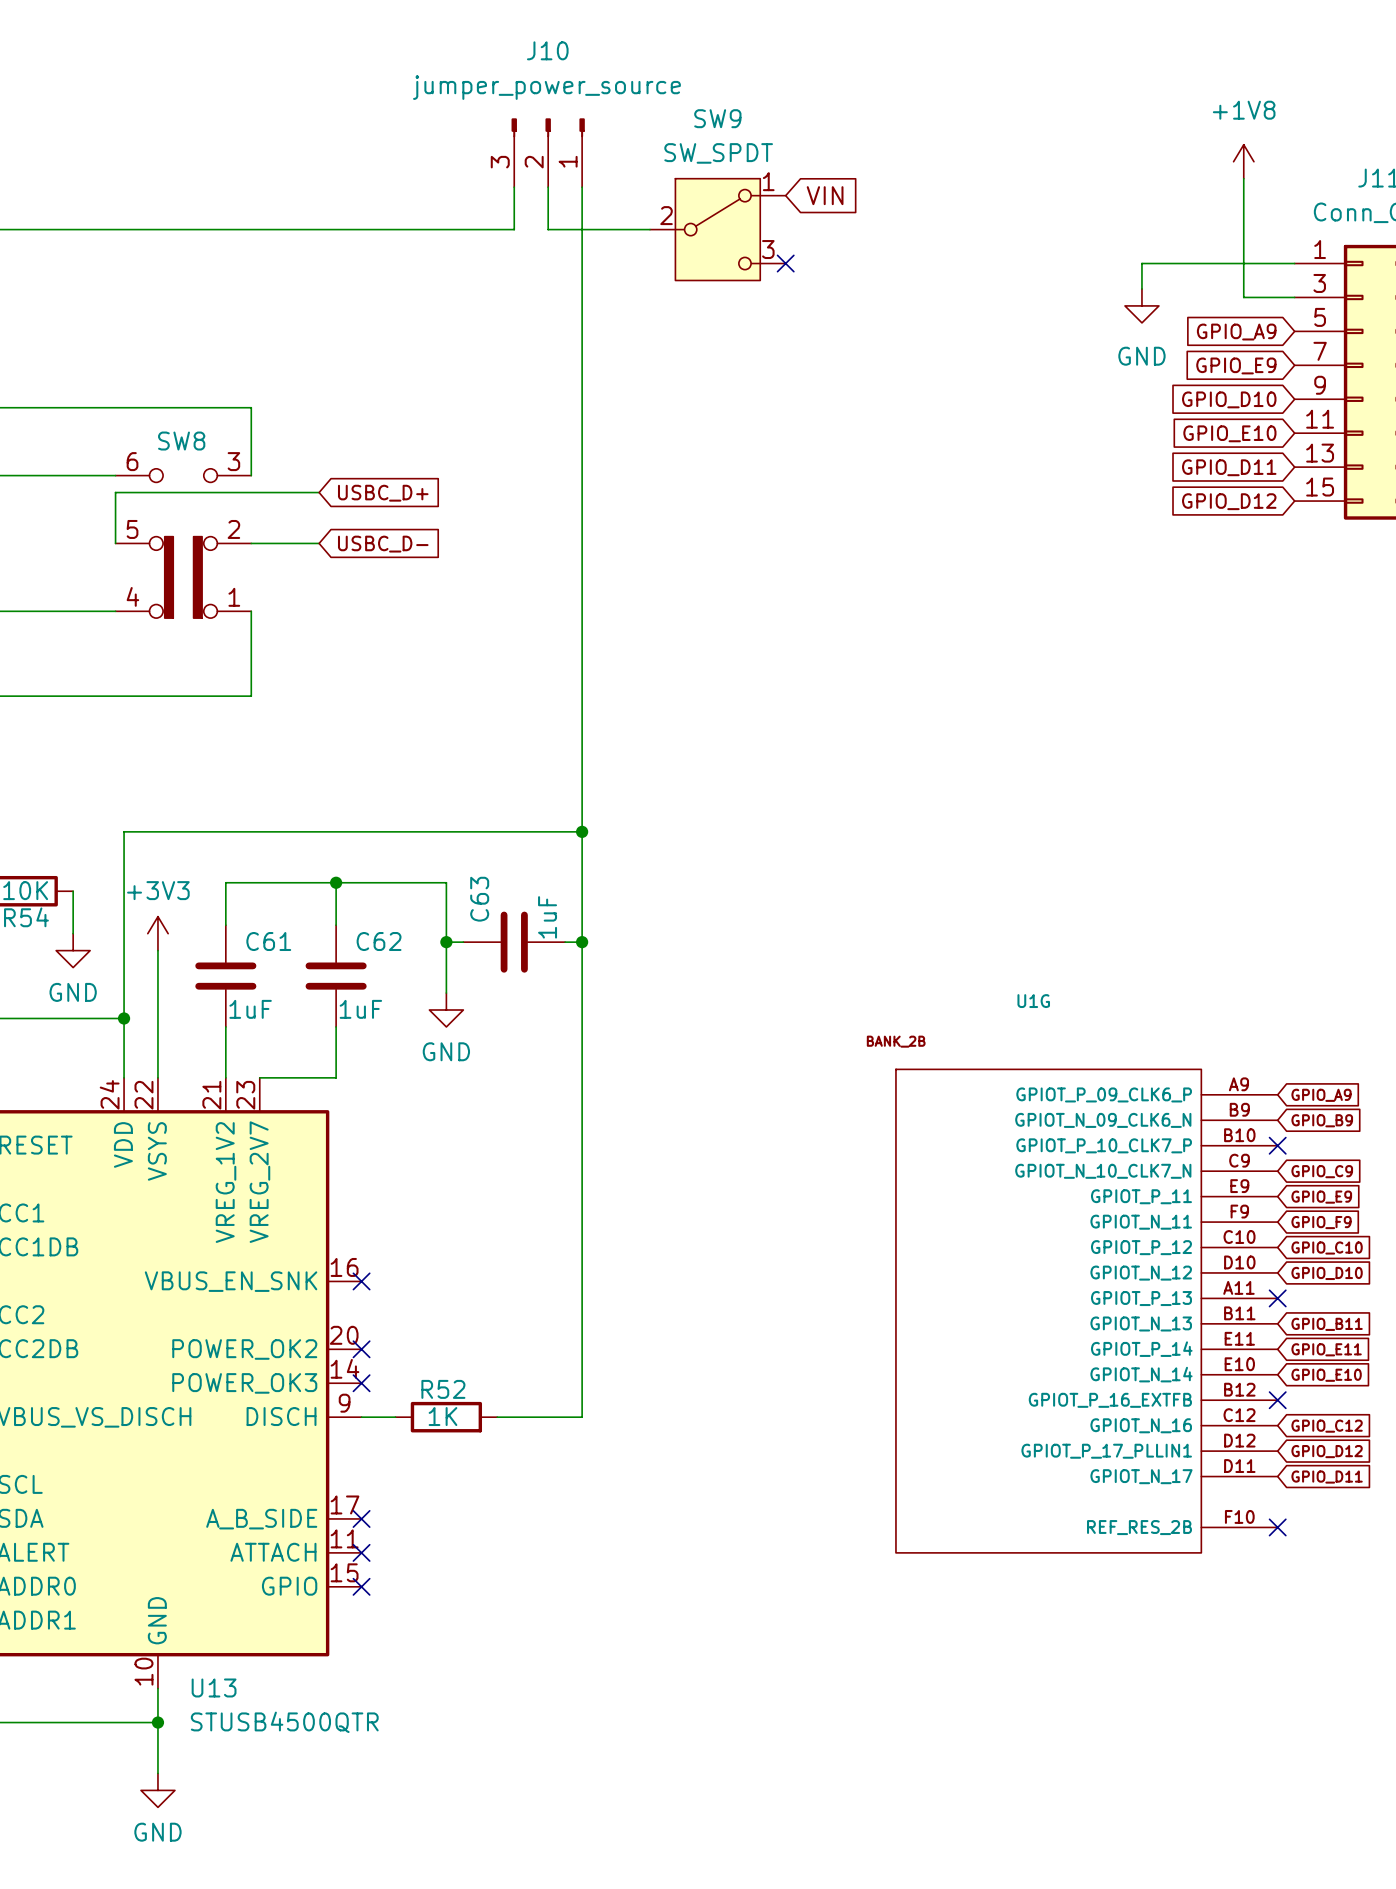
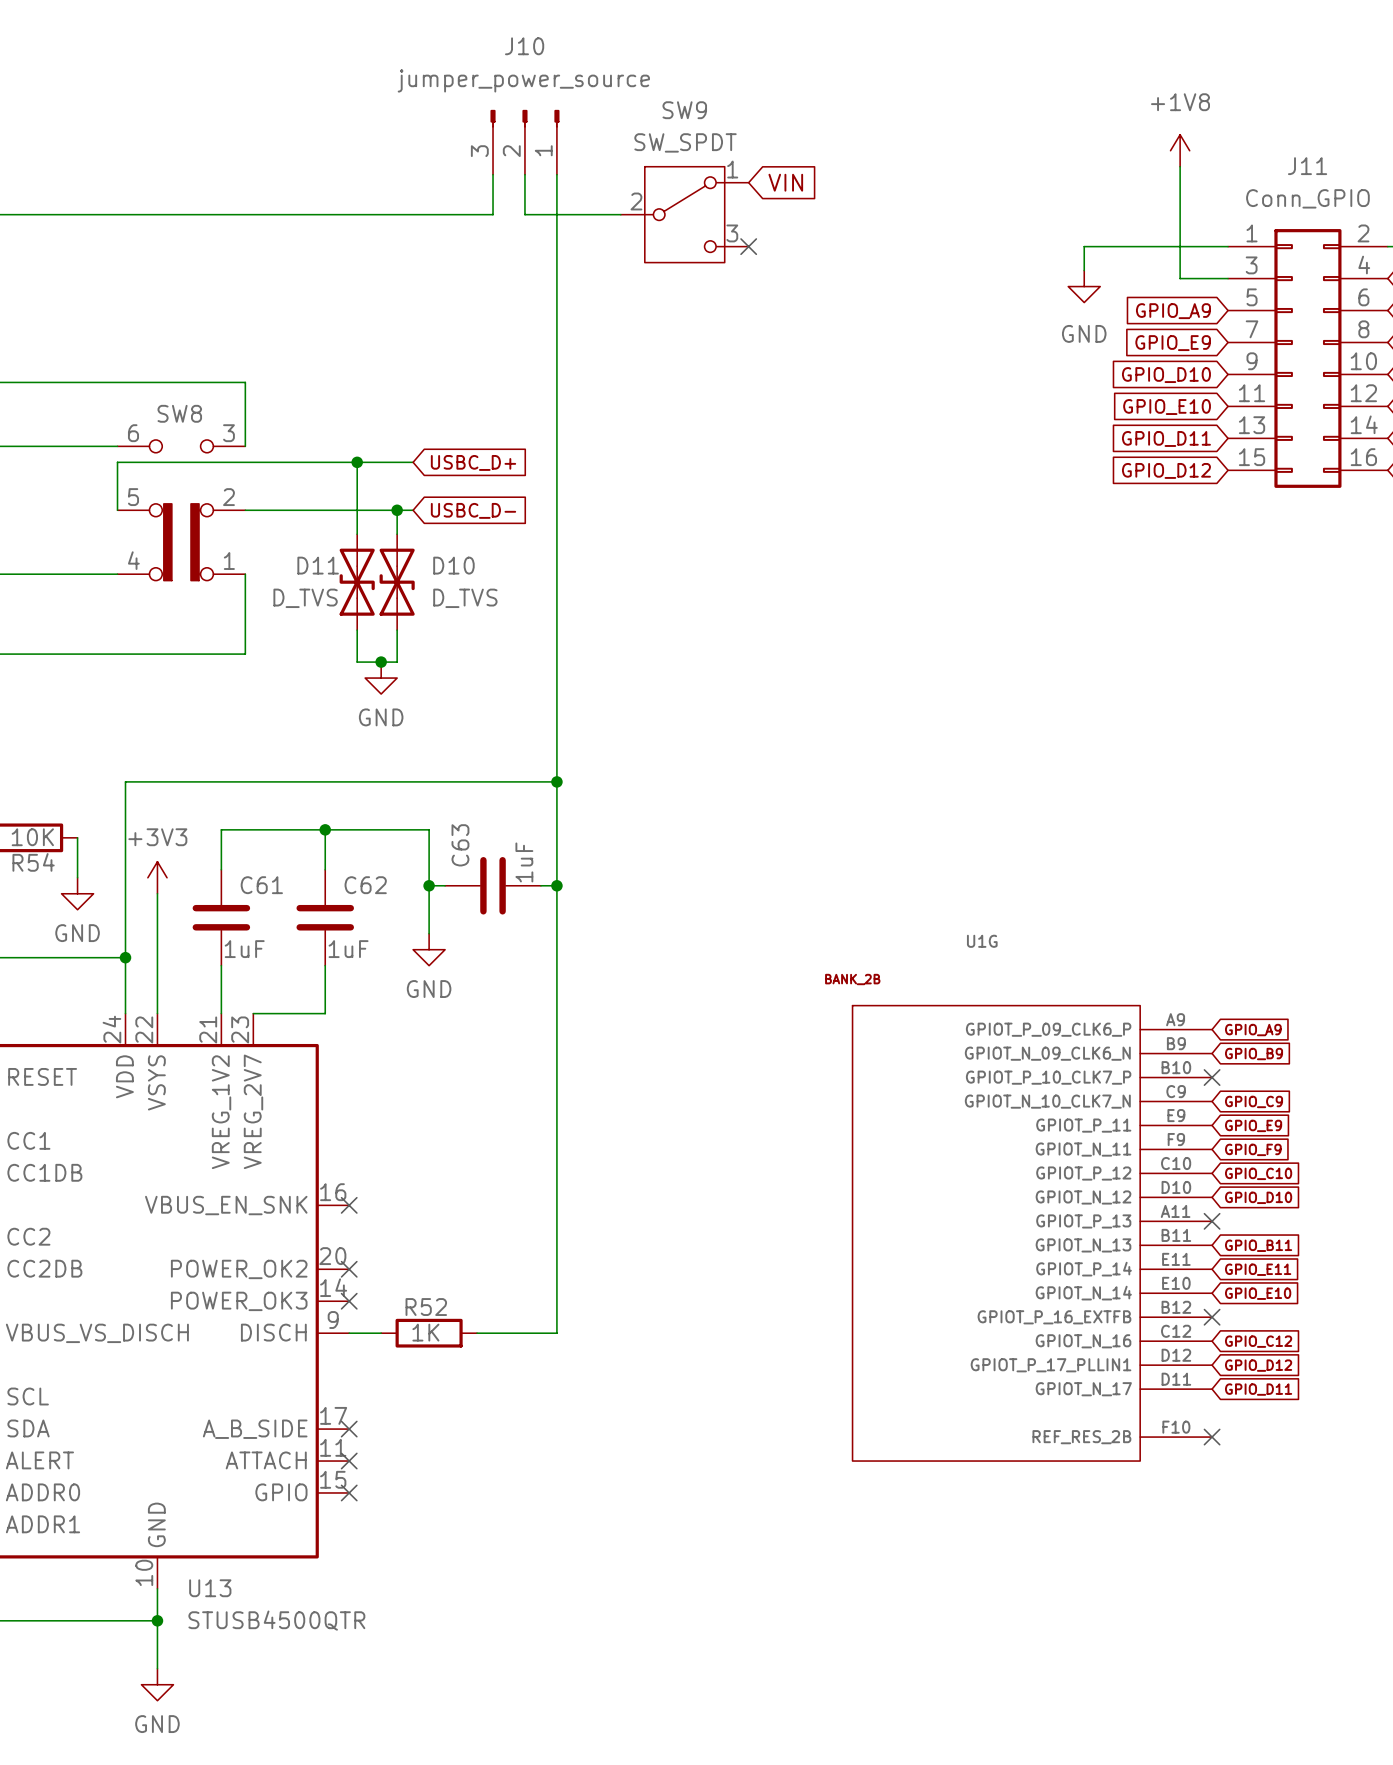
wire: none -> (309, 462) (413, 462)
wire: none -> (357, 462) (357, 534)
junction: none -> (357, 462)
global label position: USBC_D+ (383, 493) -> USBC_D+ (473, 462)
wire: none -> (309, 510) (413, 510)
wire: none -> (397, 510) (397, 534)
junction: none -> (397, 510)
global label position: USBC_D- (383, 544) -> USBC_D- (473, 510)
D11: none -> D_TVS (357, 582)
D10: none -> D_TVS (397, 582)
wire: none -> (357, 630) (357, 662) (397, 662) (397, 630)
junction: none -> (381, 662)
power symbol: none -> GND (381, 678)

